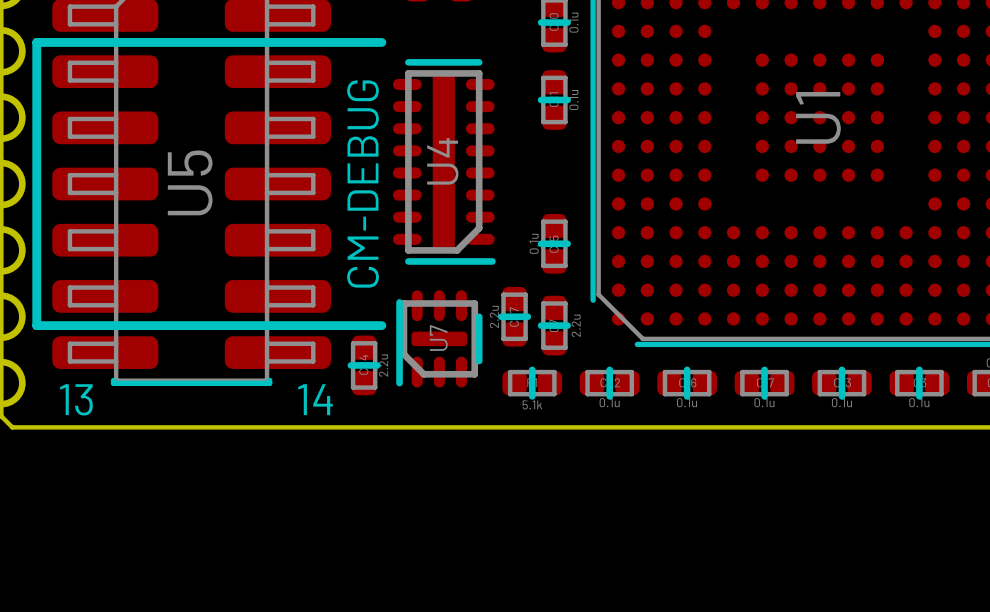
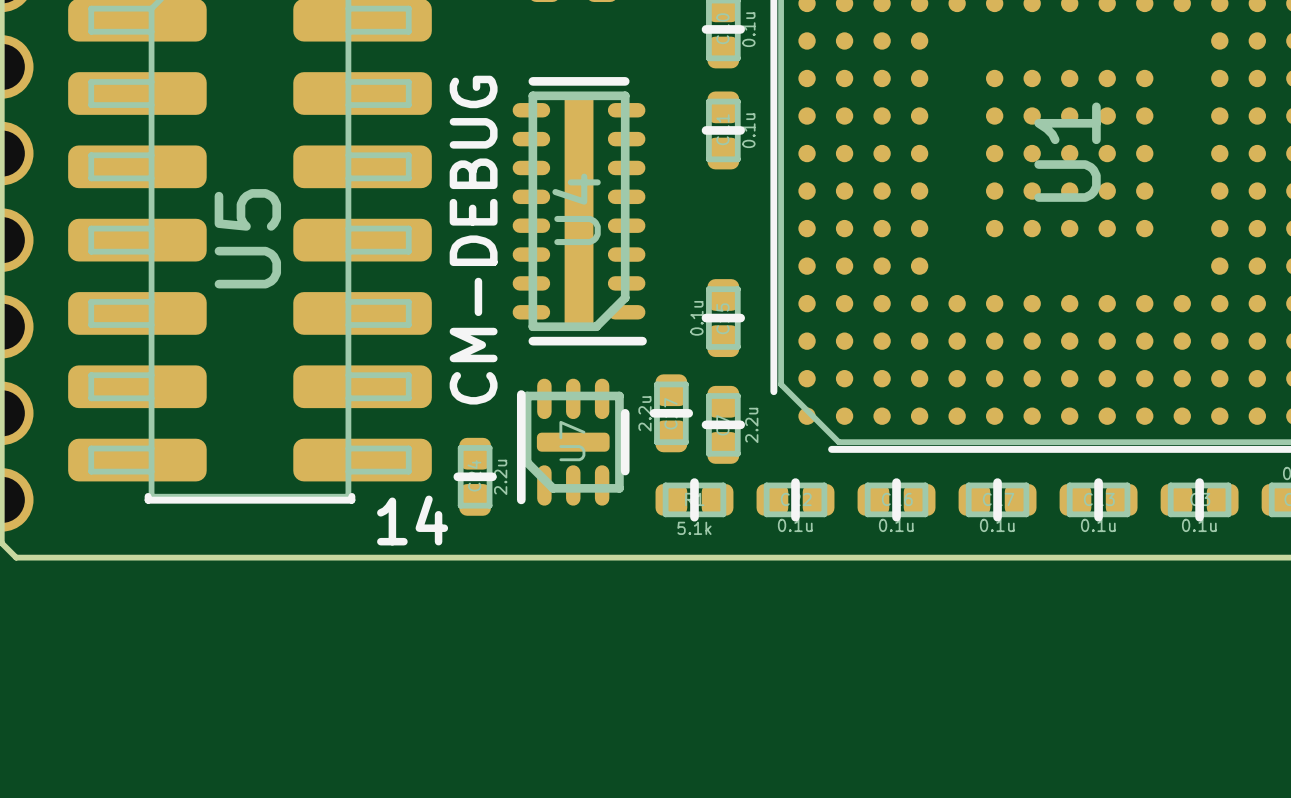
line: (381, 42) (36, 42) (36, 325) (381, 325) -> none
text: 13 (76, 399) -> none

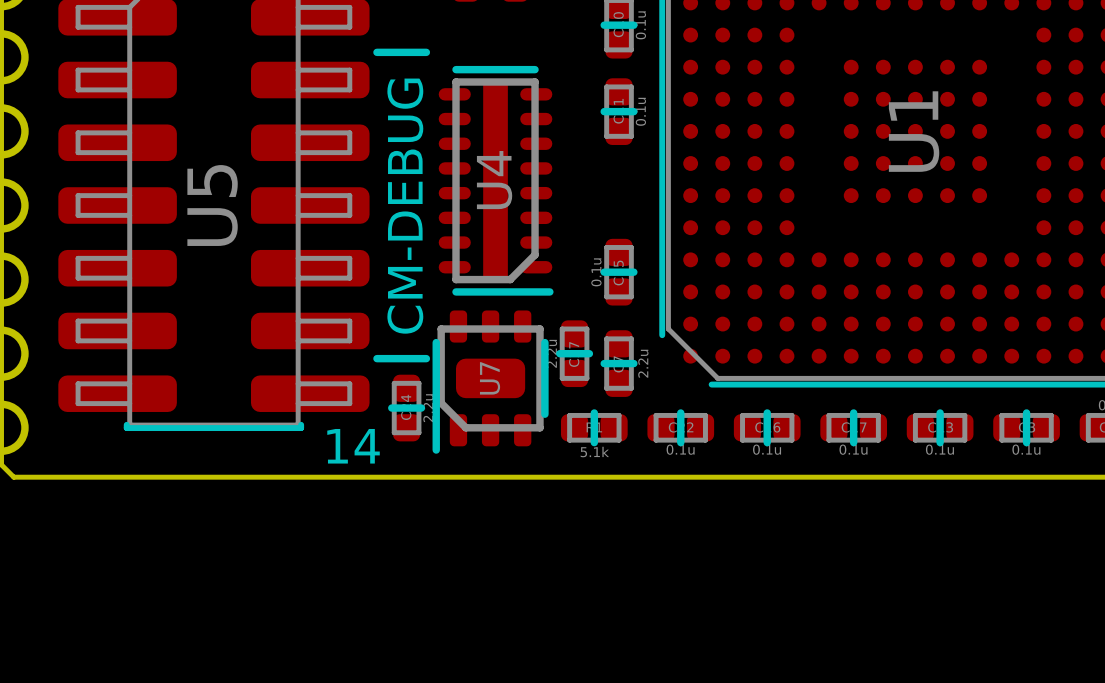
line: none -> (376, 52) (426, 52)
U7 footprint: [516, 378, 630, 506] -> [432, 310, 549, 454]
line: none -> (376, 358) (426, 358)

